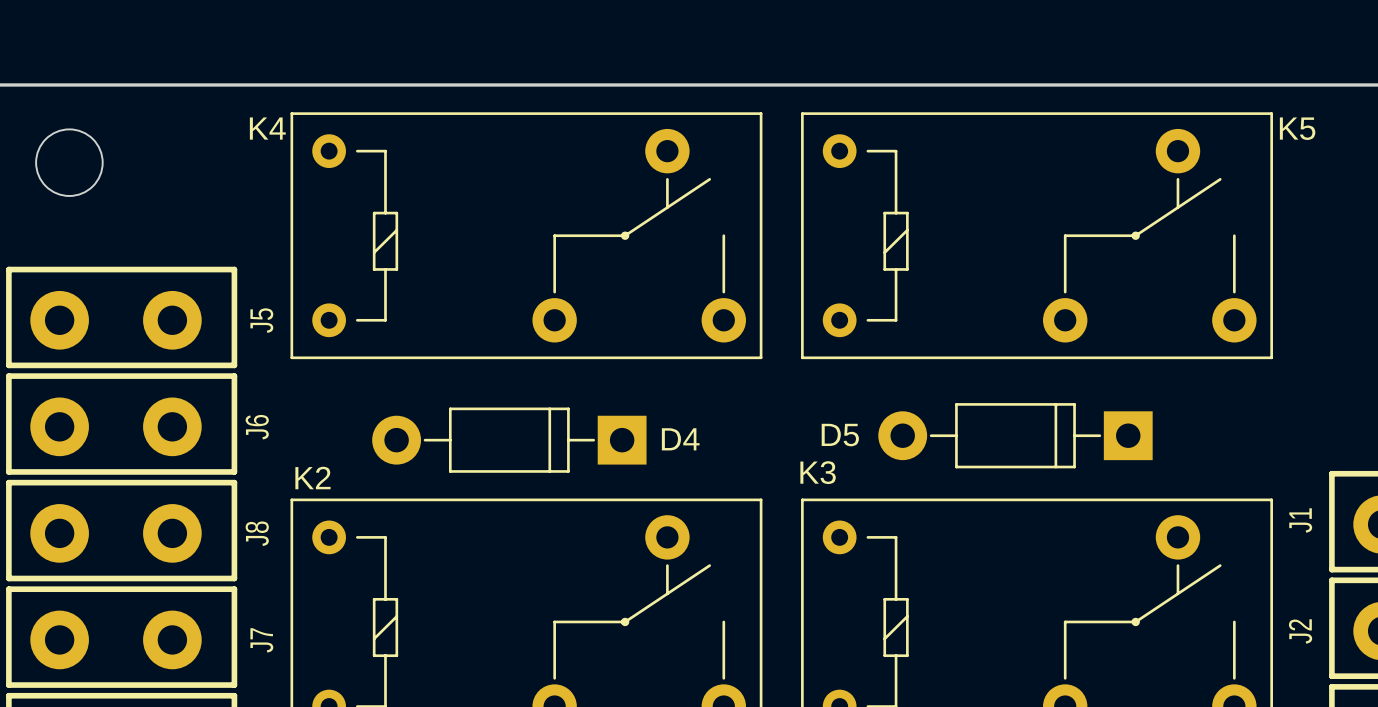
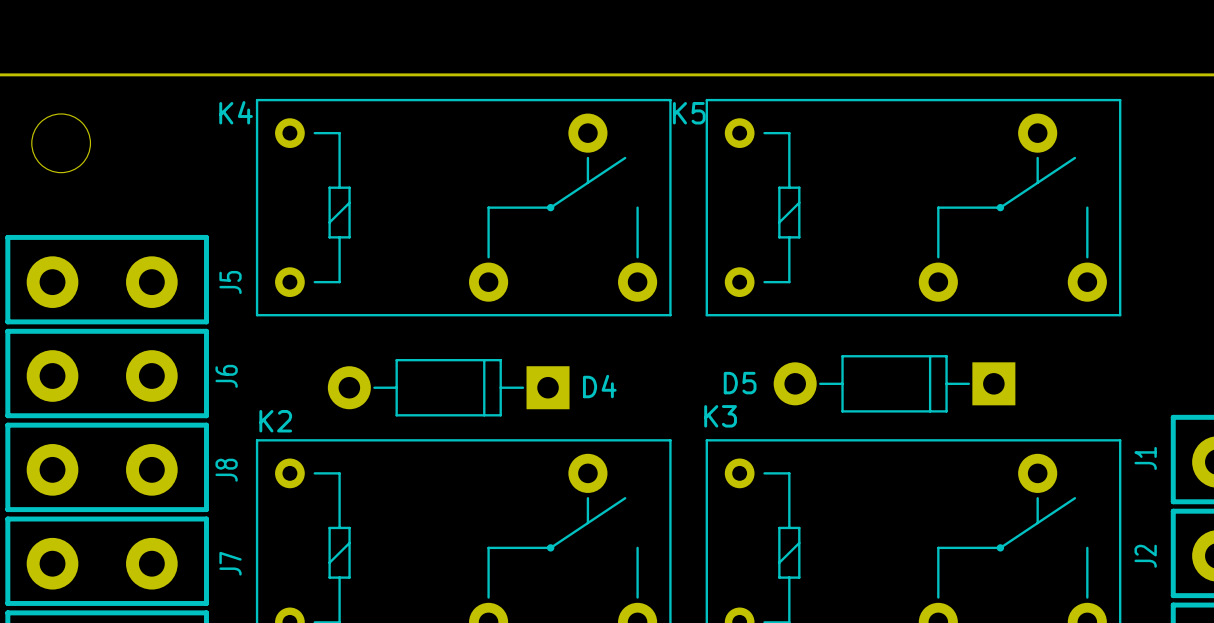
K5 name position: K5 (1297, 128) -> K5 (689, 113)

